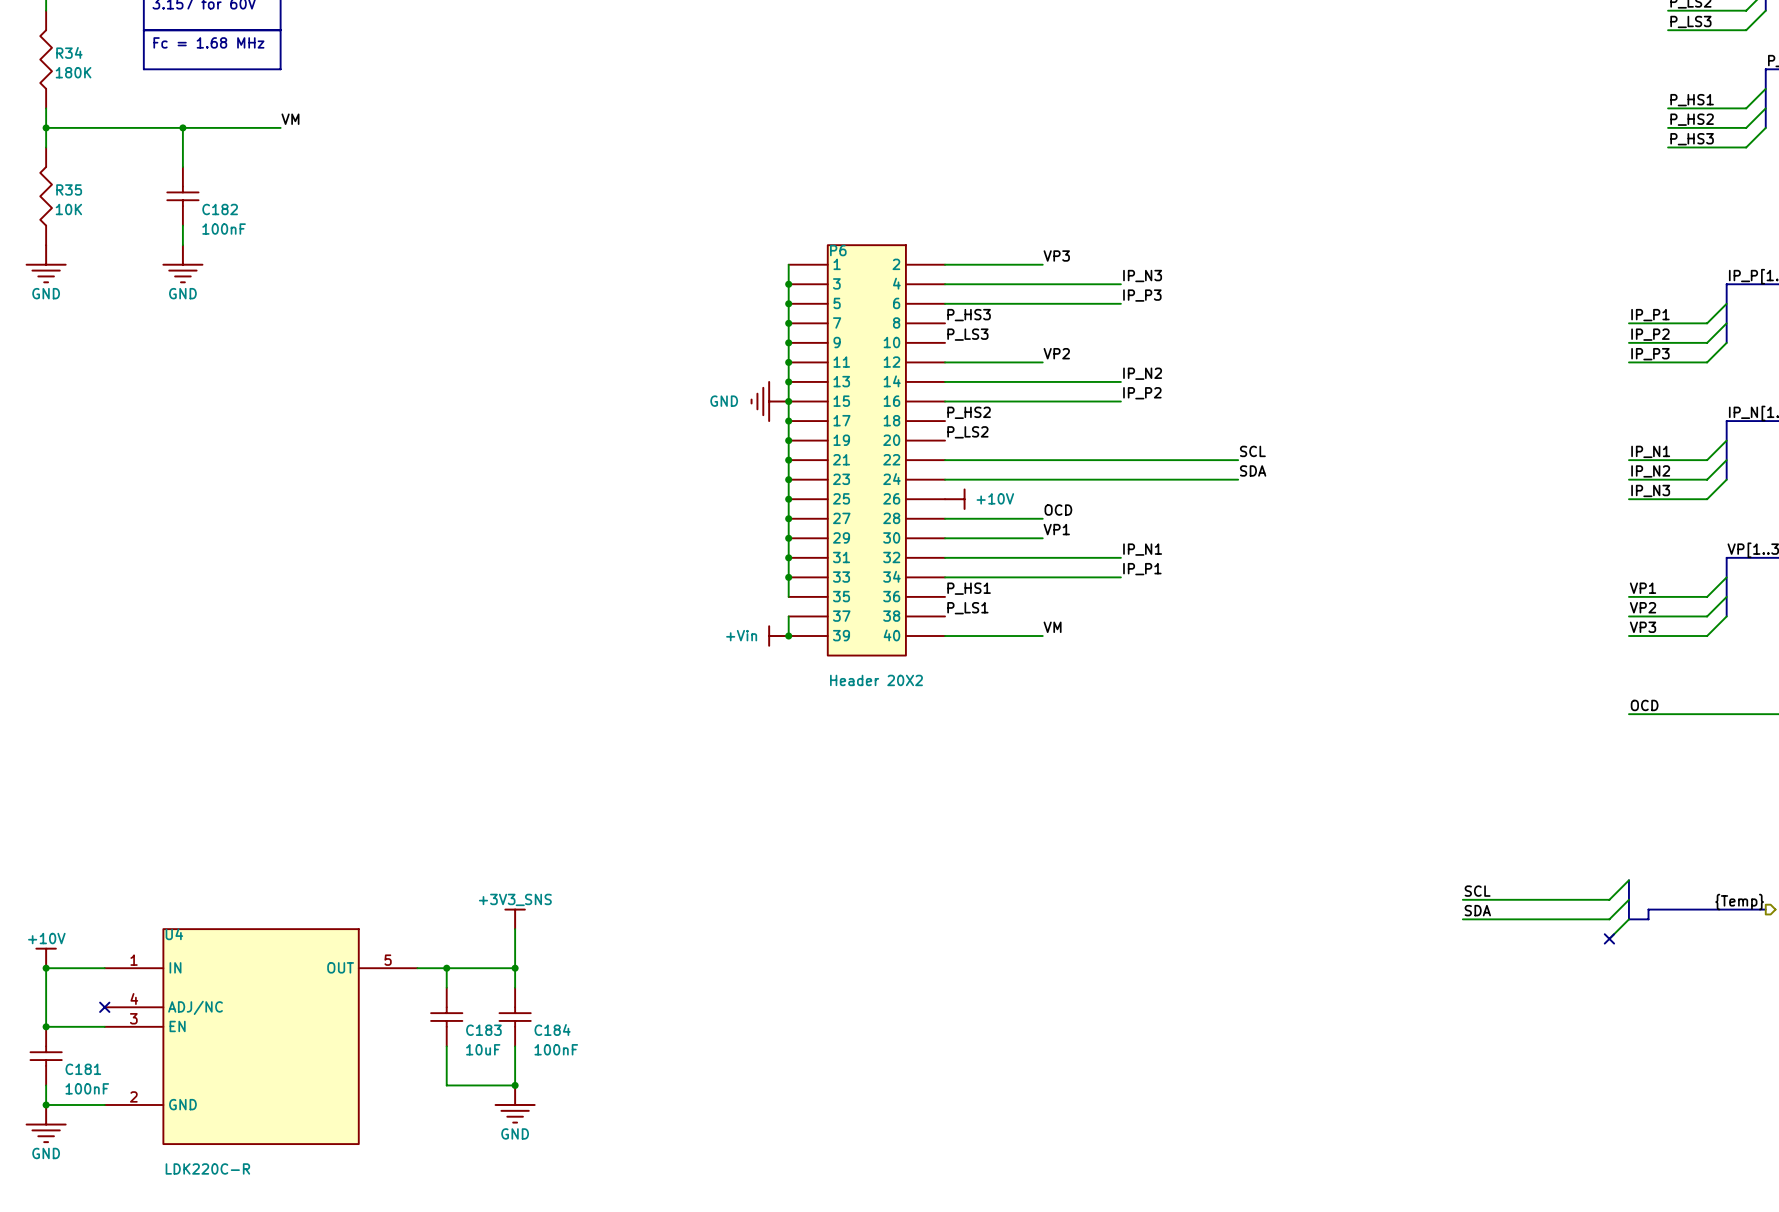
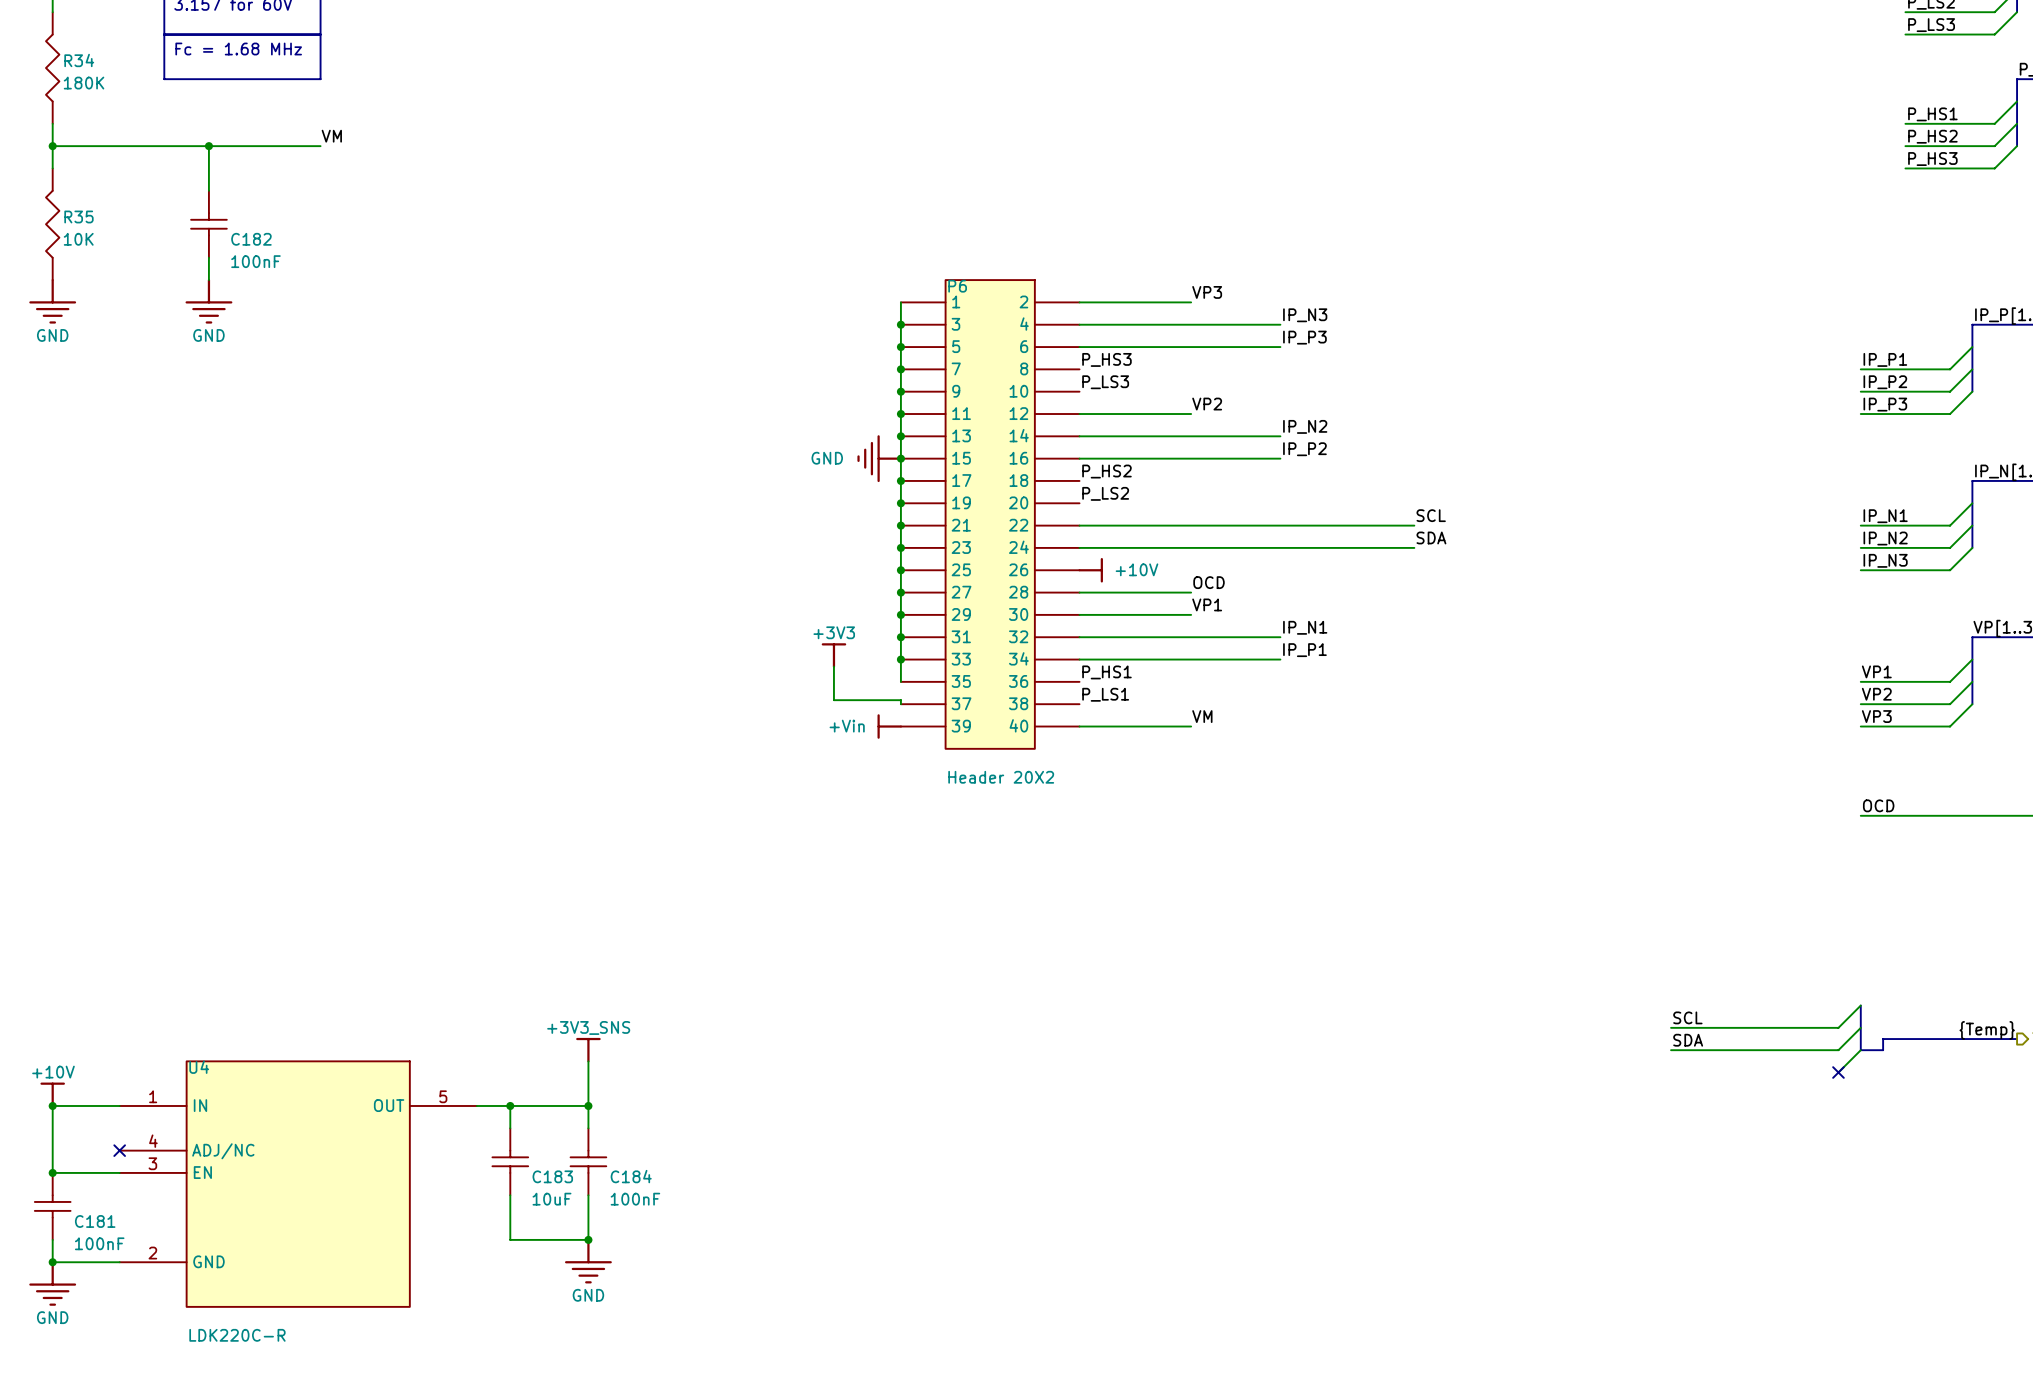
power symbol: none -> +3V3 (833, 655)
wire: (788, 616) (788, 636) -> (900, 704) (900, 700) (833, 700) (833, 666)
junction: (788, 636) -> none

